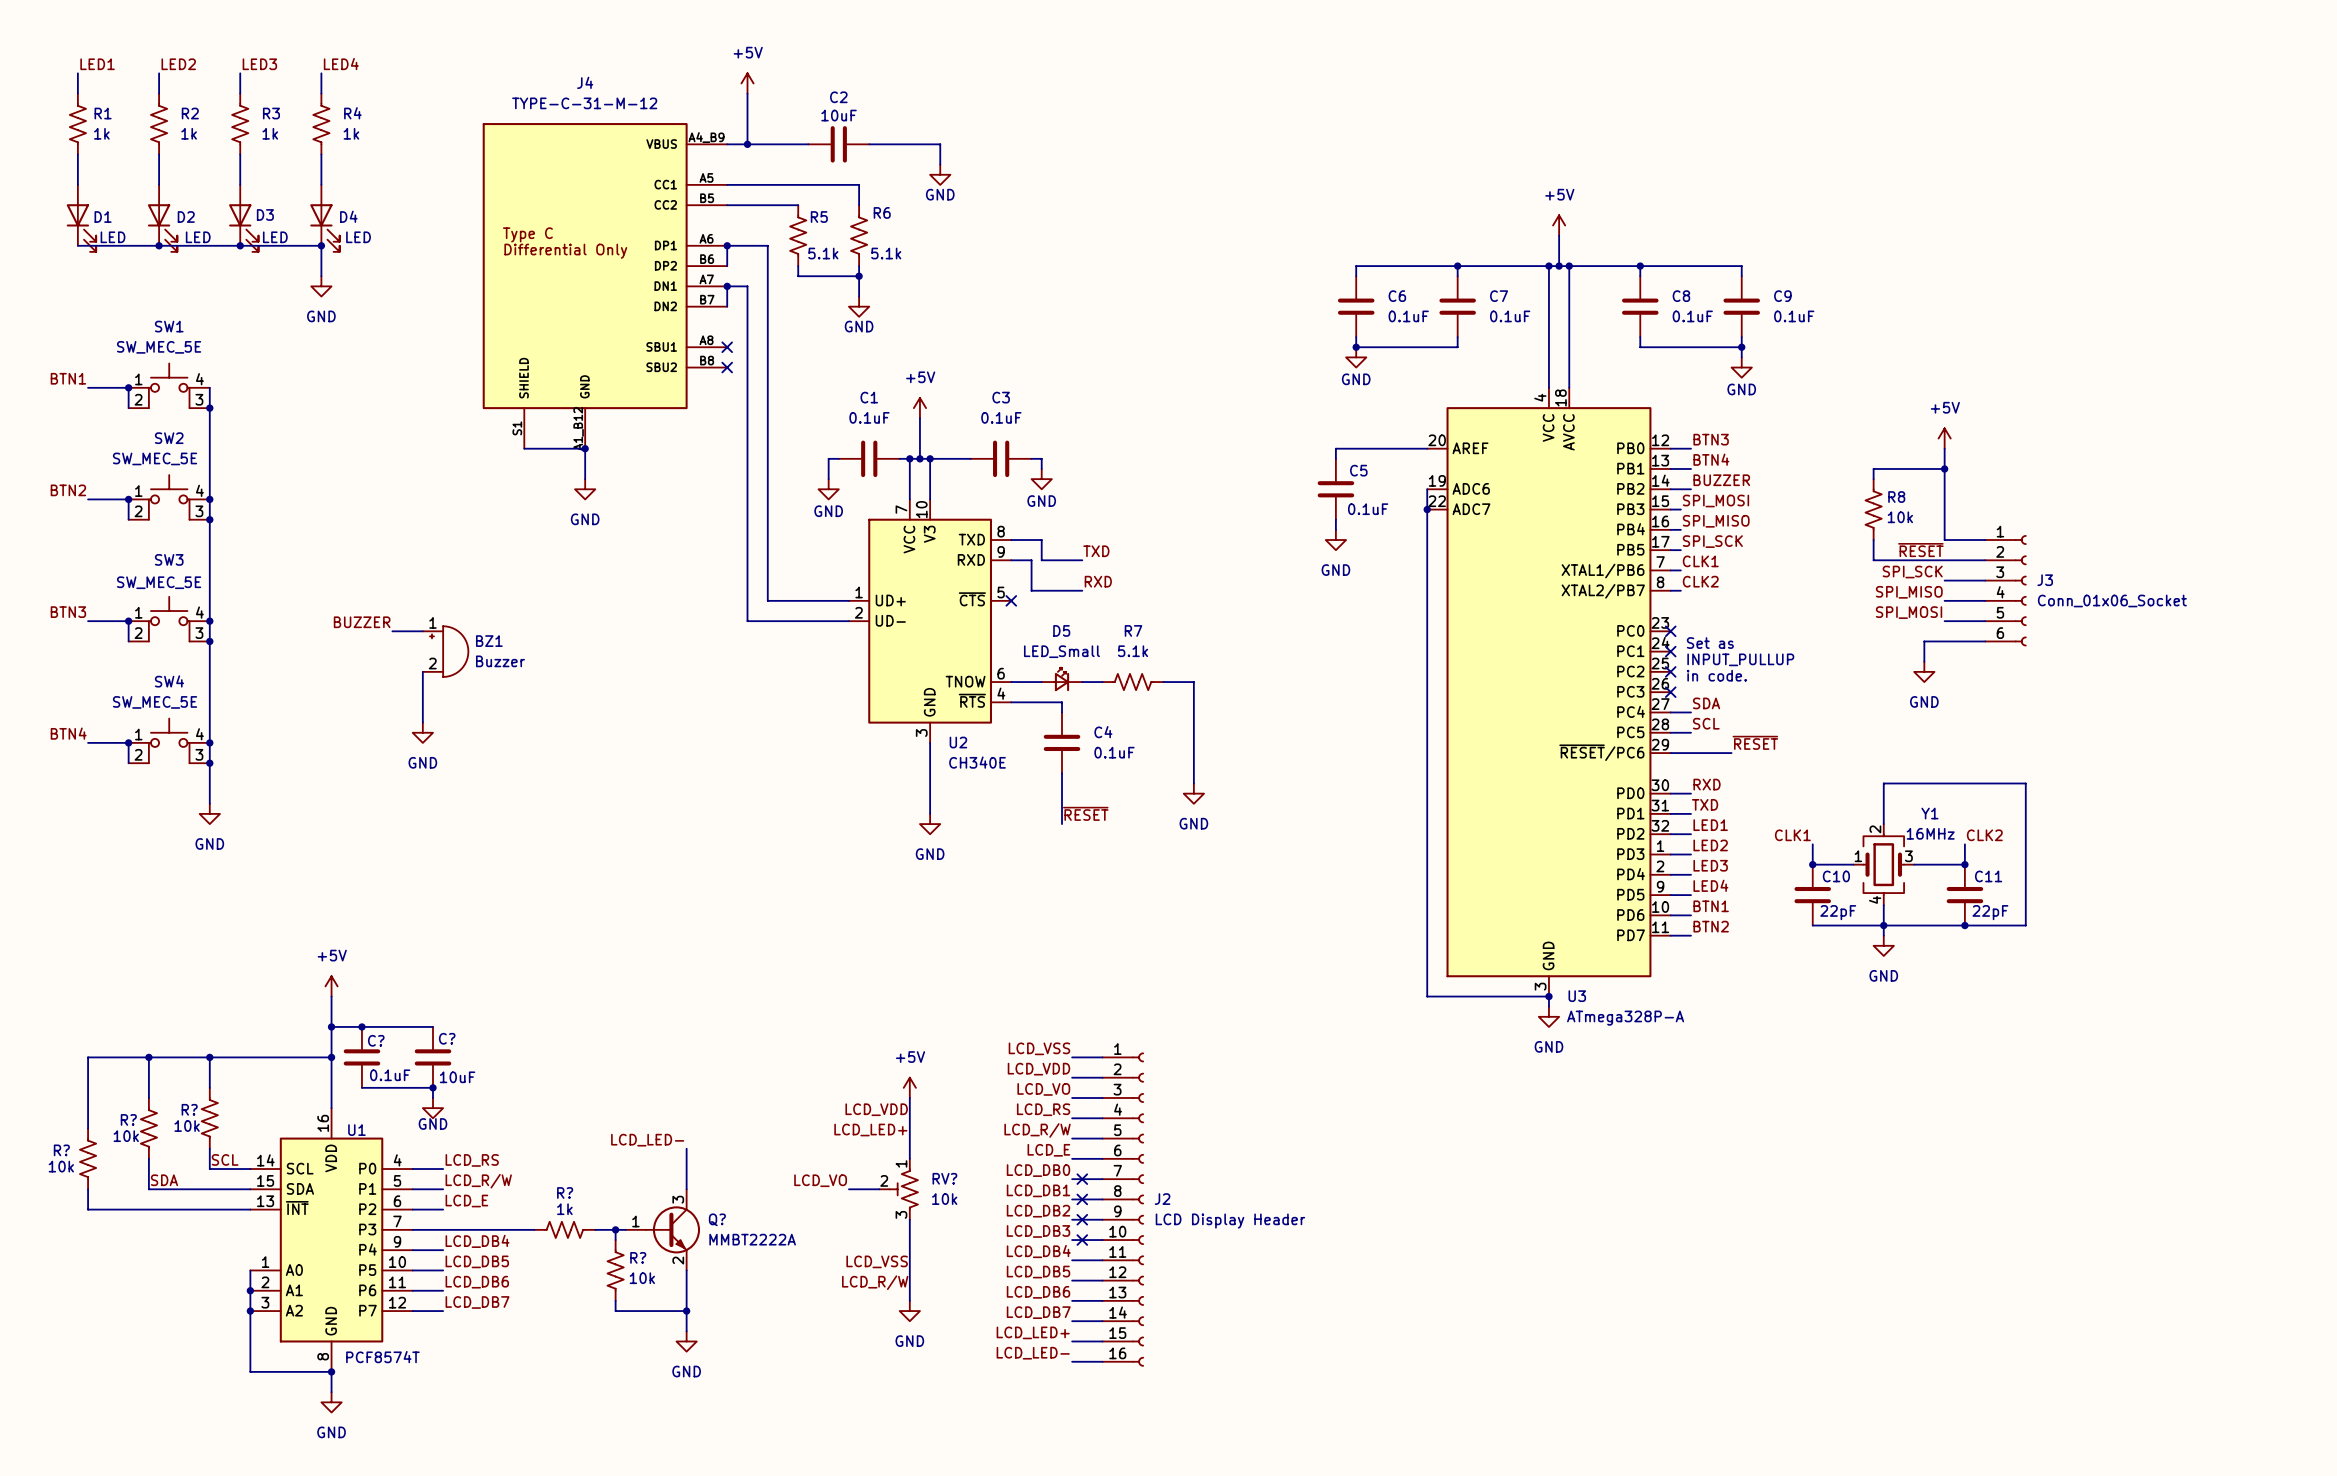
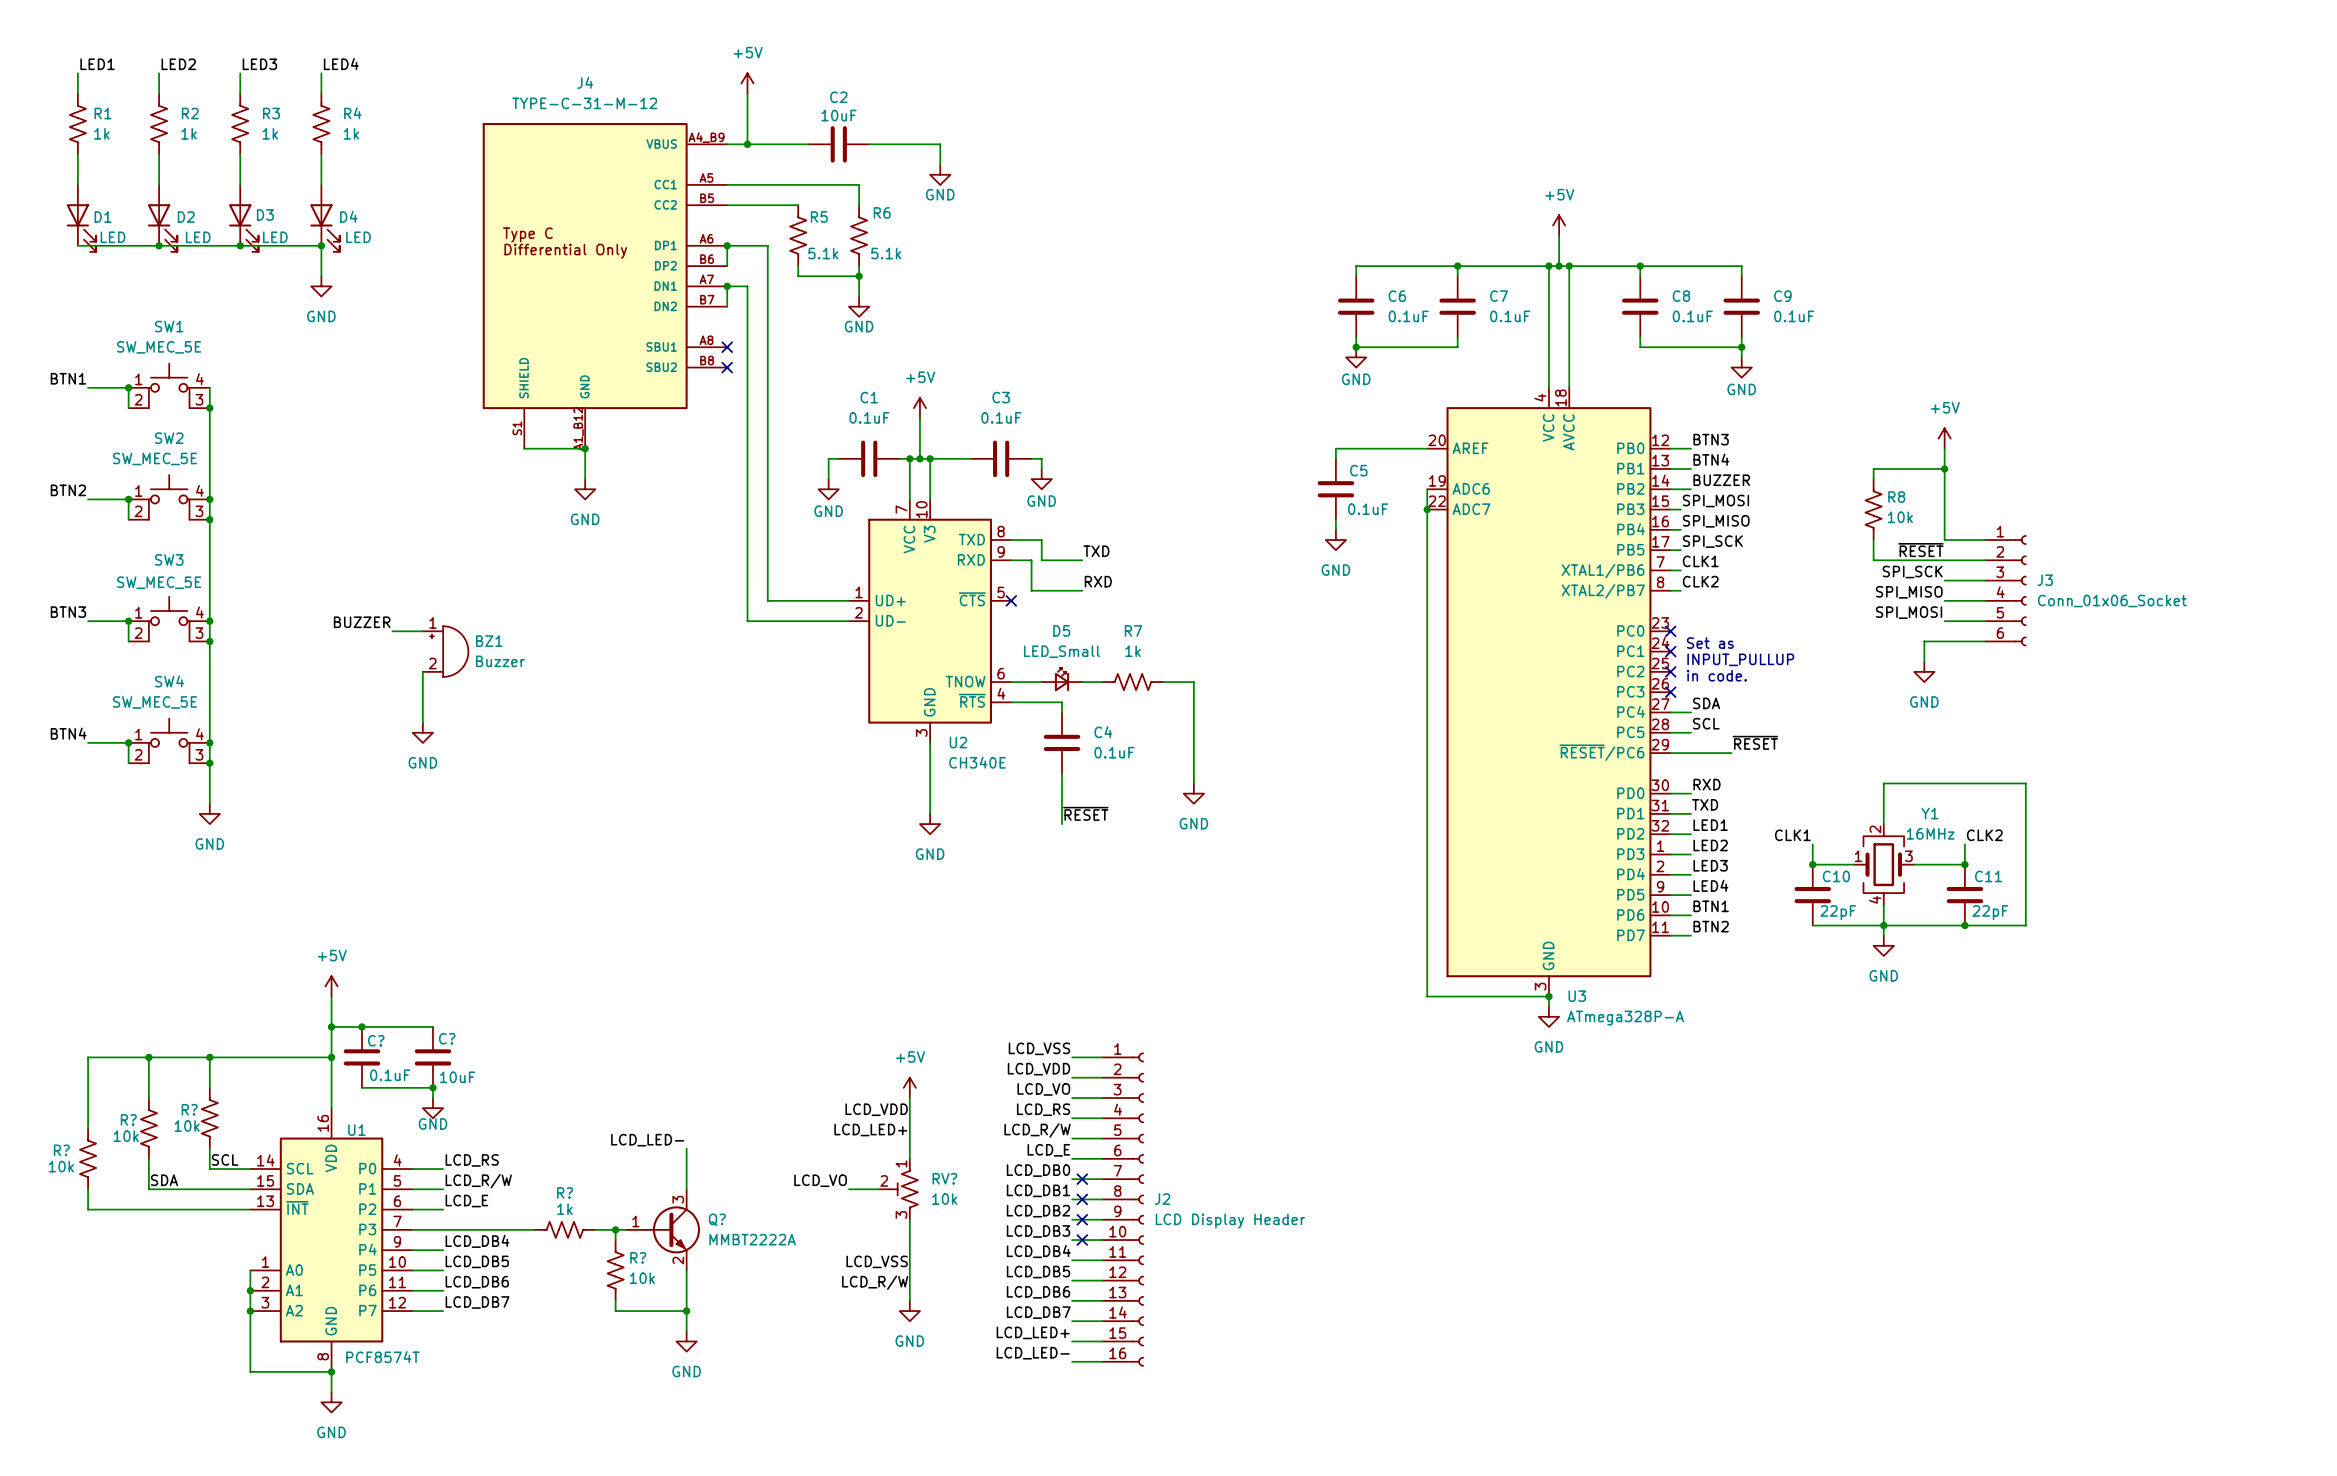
R7 value: 5.1k (1133, 651) -> 1k (1133, 651)

